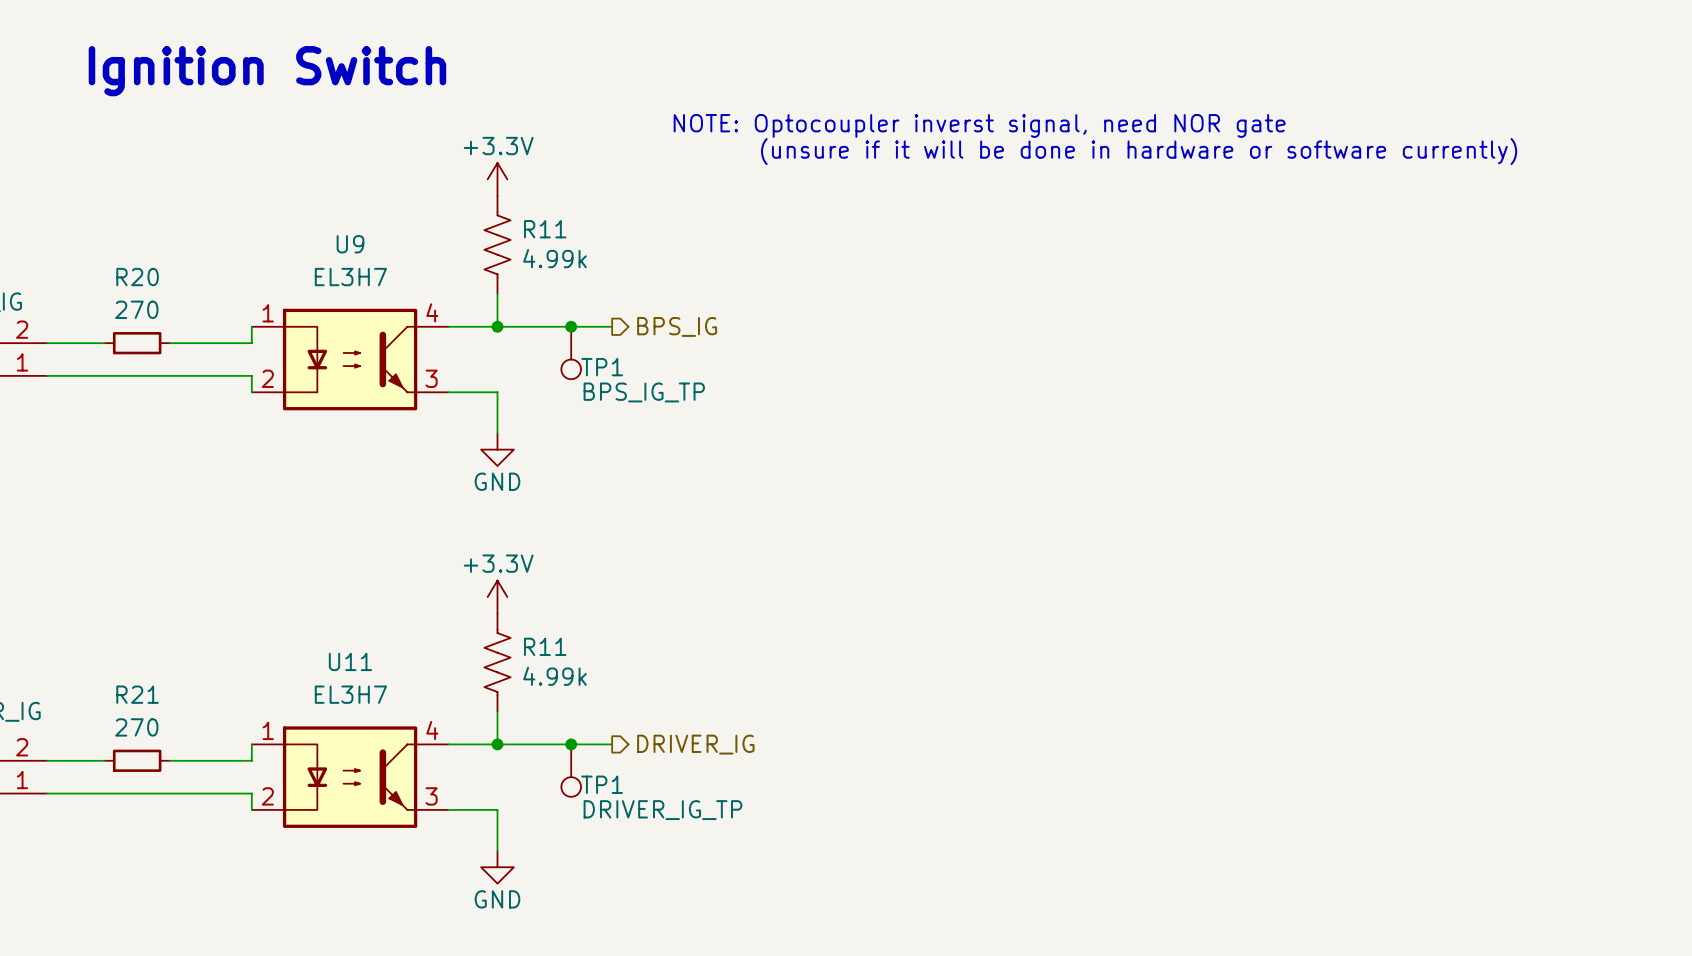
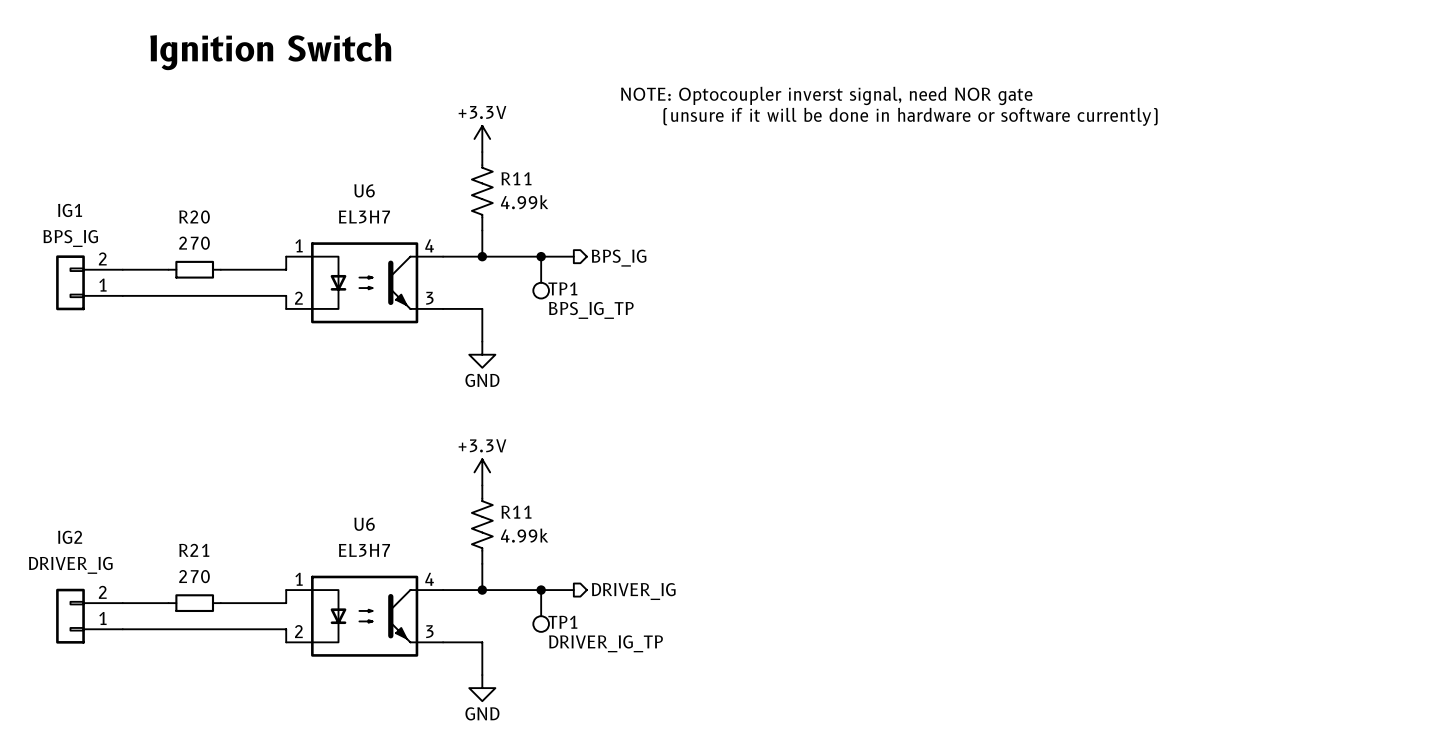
U9 name: U9 (350, 244) -> U6 (364, 190)
U11 name: U11 (350, 661) -> U6 (364, 524)

